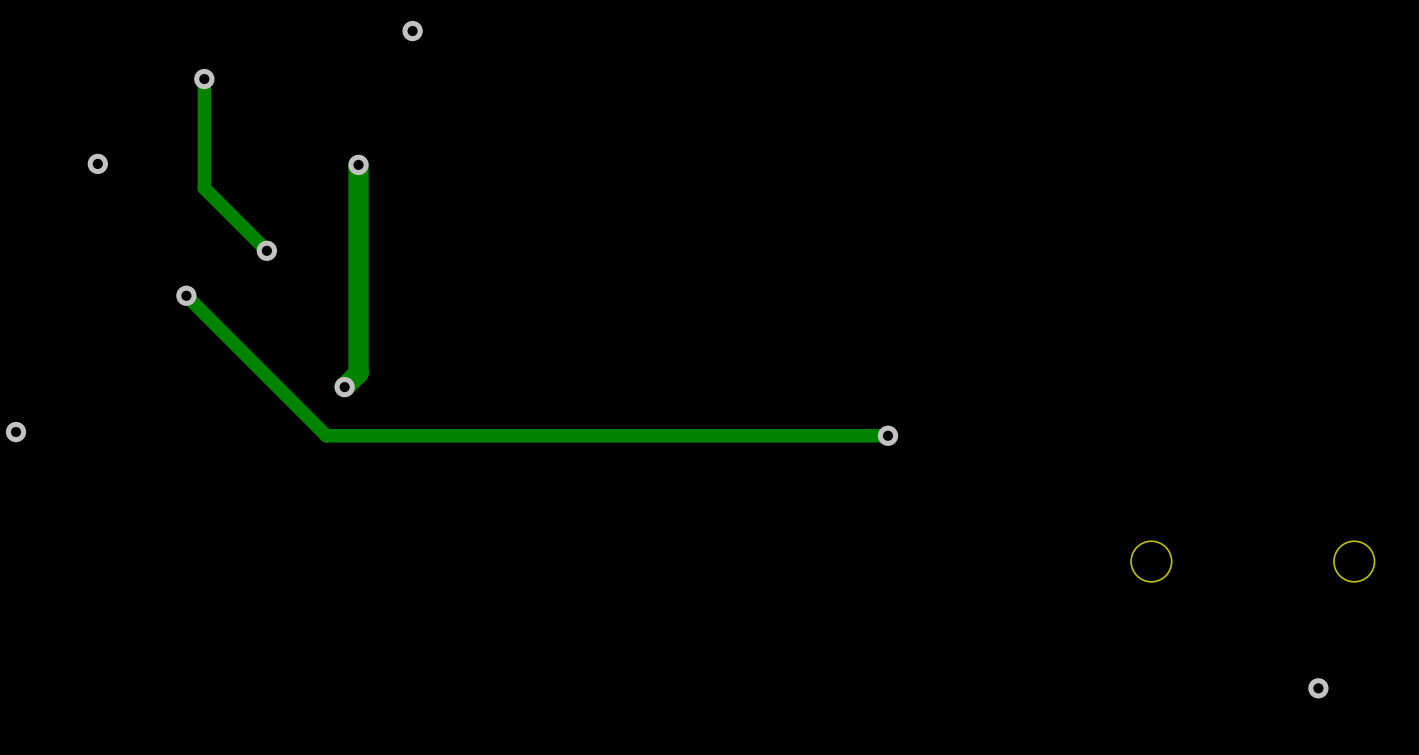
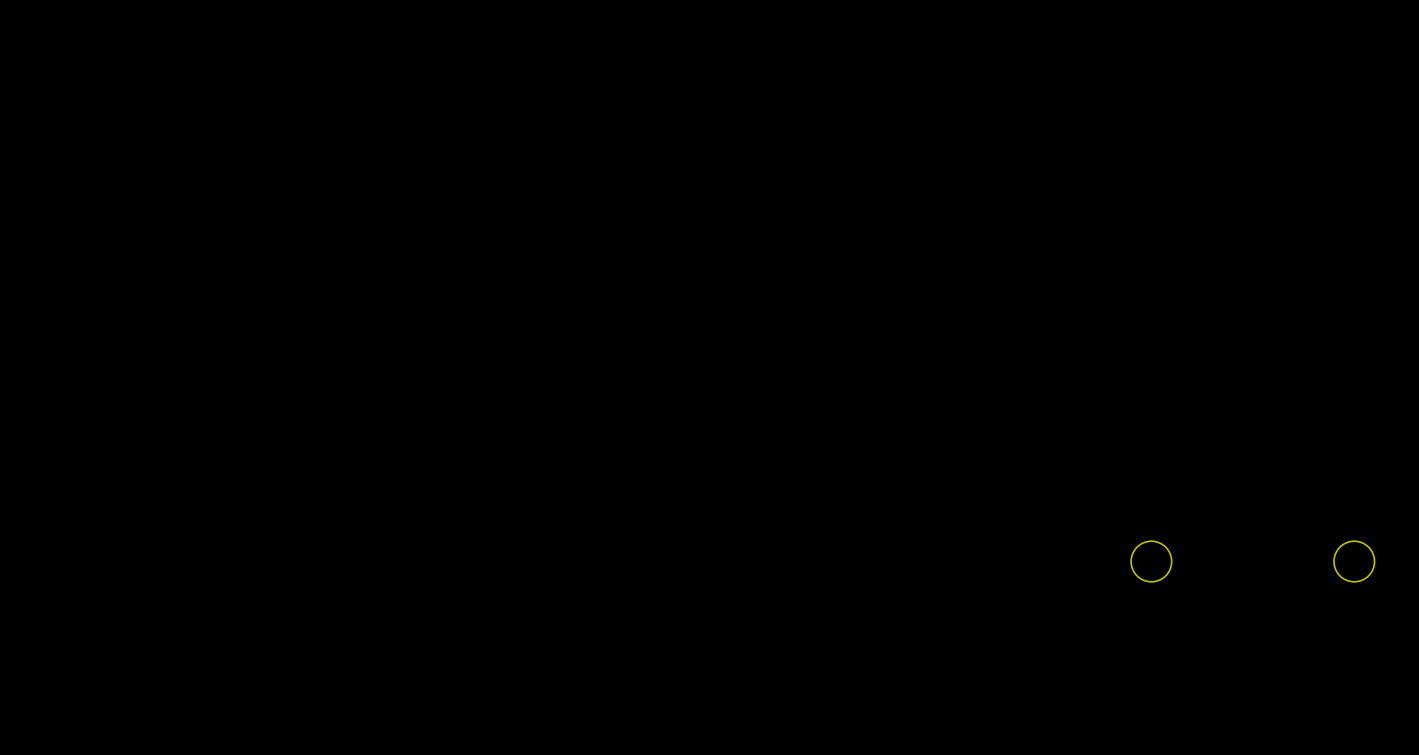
via: (412, 31) -> none
track: (204, 79) (204, 188) (266, 250) -> none
via: (204, 79) -> none
via: (97, 163) -> none
track: (358, 164) (358, 373) (344, 387) -> none
via: (358, 164) -> none
via: (266, 250) -> none
track: (186, 295) (326, 435) (887, 435) -> none
via: (186, 295) -> none
via: (344, 387) -> none
via: (16, 432) -> none
via: (887, 435) -> none
via: (1318, 688) -> none

